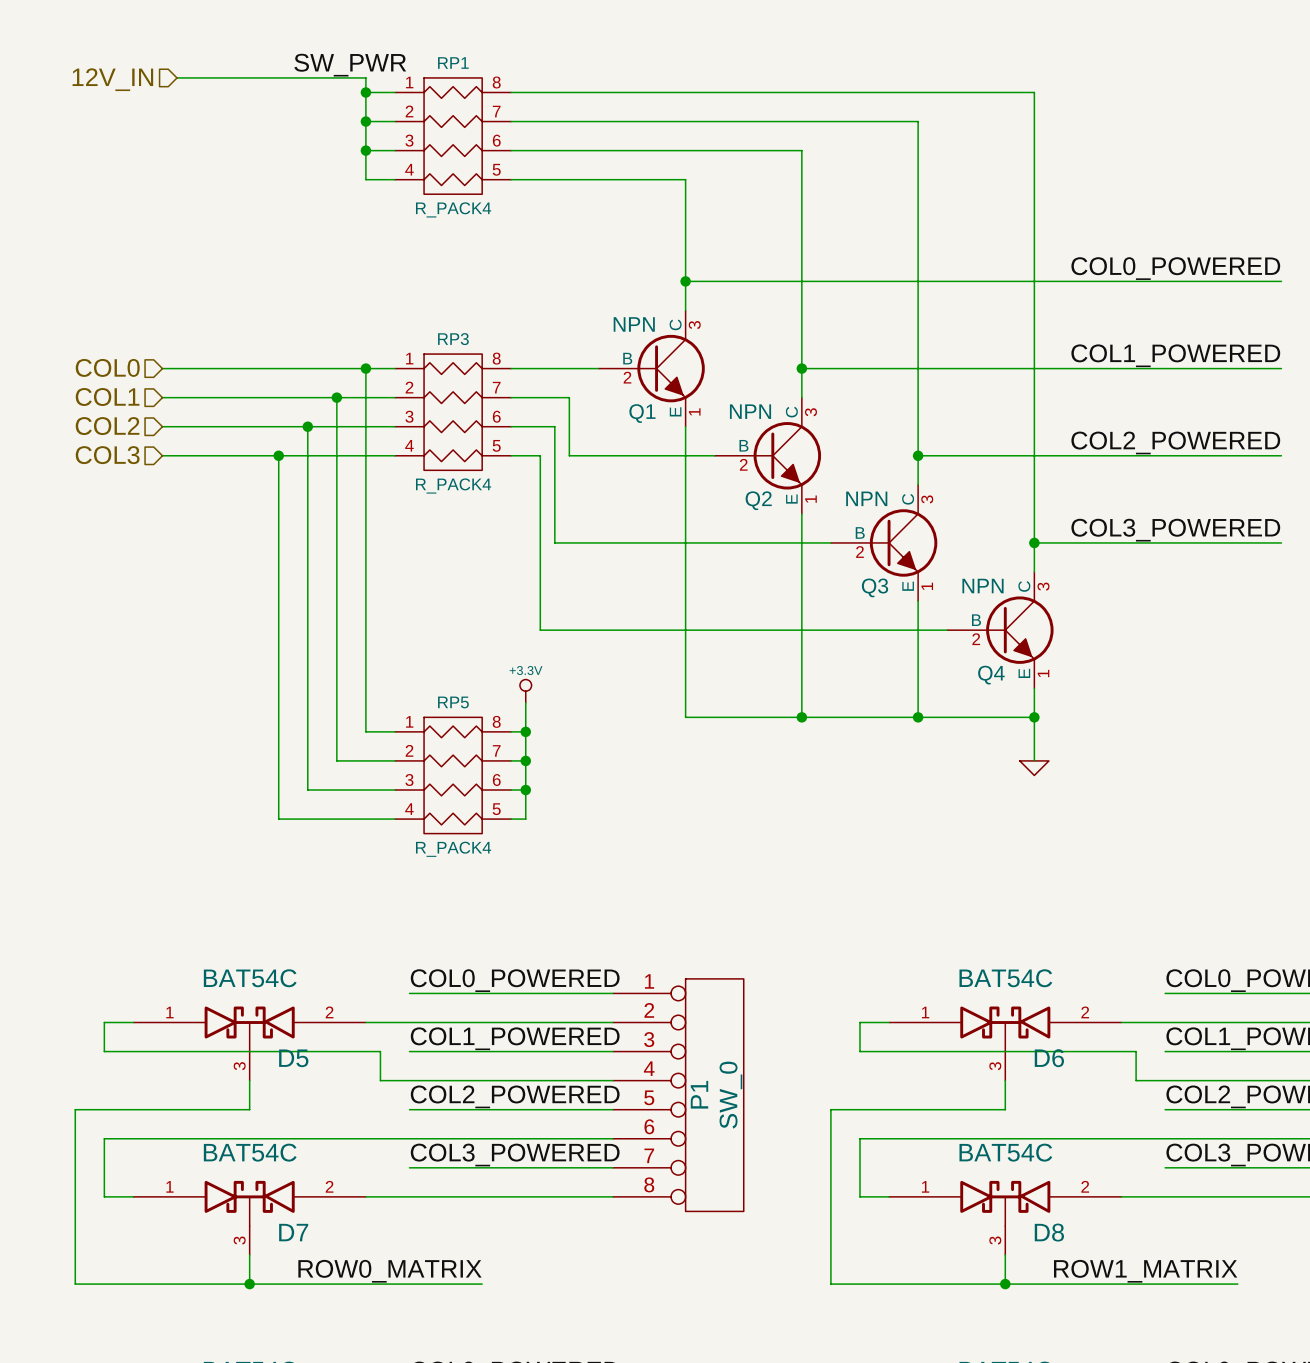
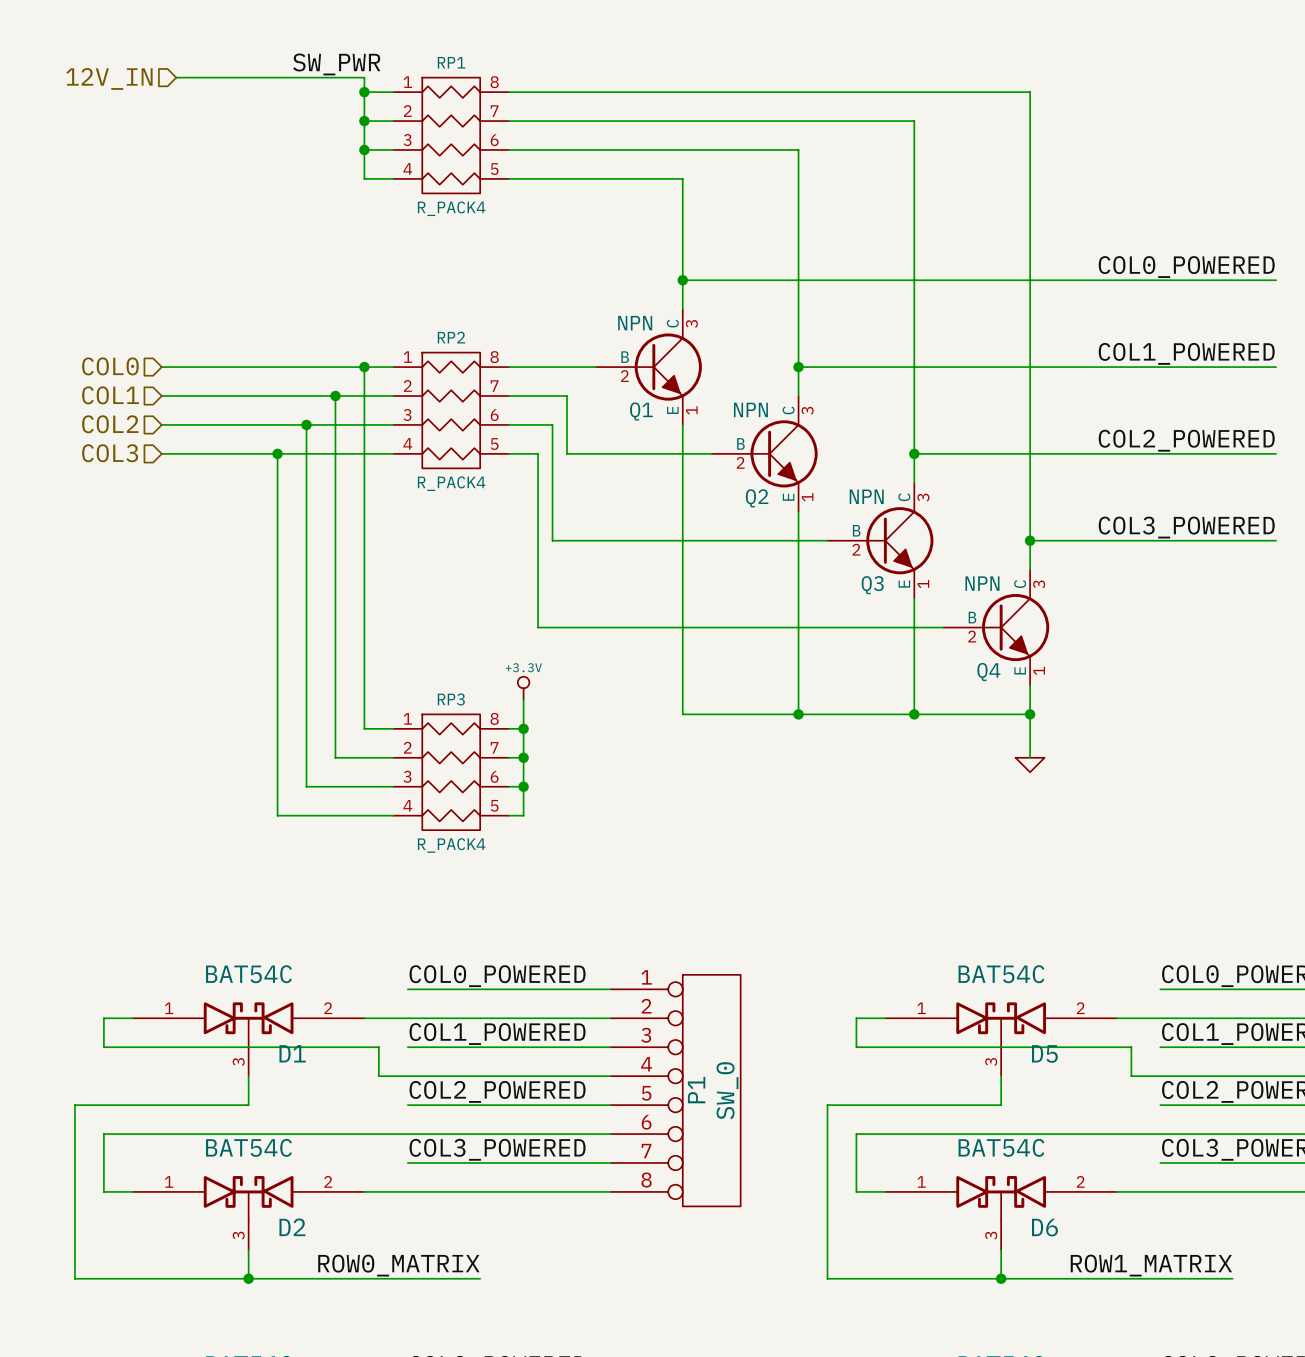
RP3 name: RP3 (453, 339) -> RP2 (451, 337)
RP5 name: RP5 (453, 702) -> RP3 (451, 699)
D5 name: D5 (293, 1058) -> D1 (292, 1053)
D6 name: D6 (1049, 1058) -> D5 (1044, 1053)
D7 name: D7 (293, 1232) -> D2 (292, 1227)
D8 name: D8 (1049, 1232) -> D6 (1044, 1227)

